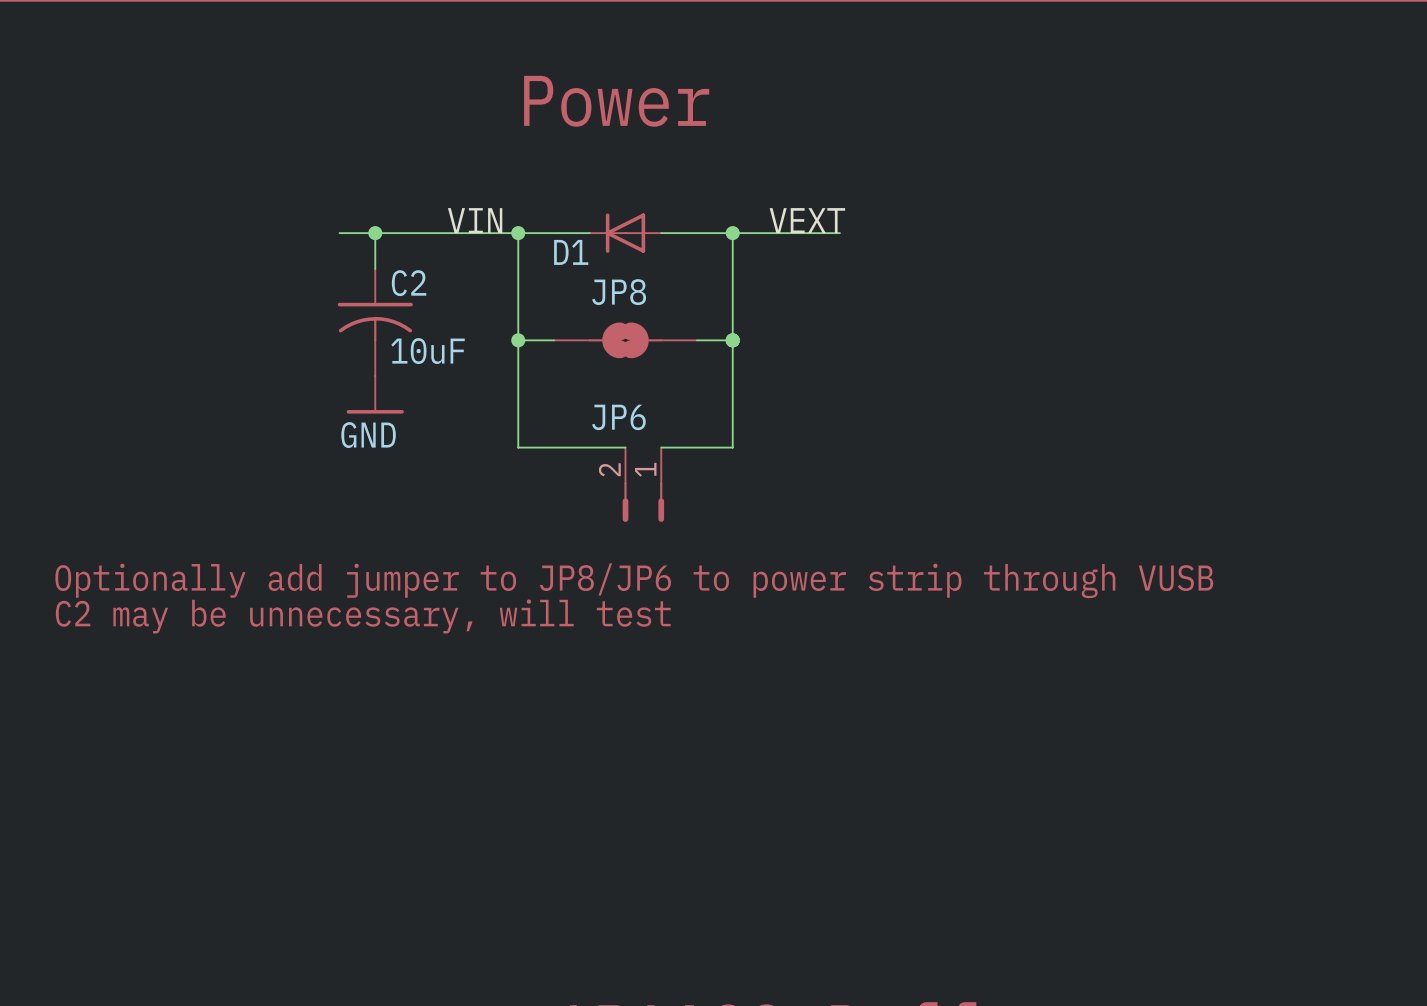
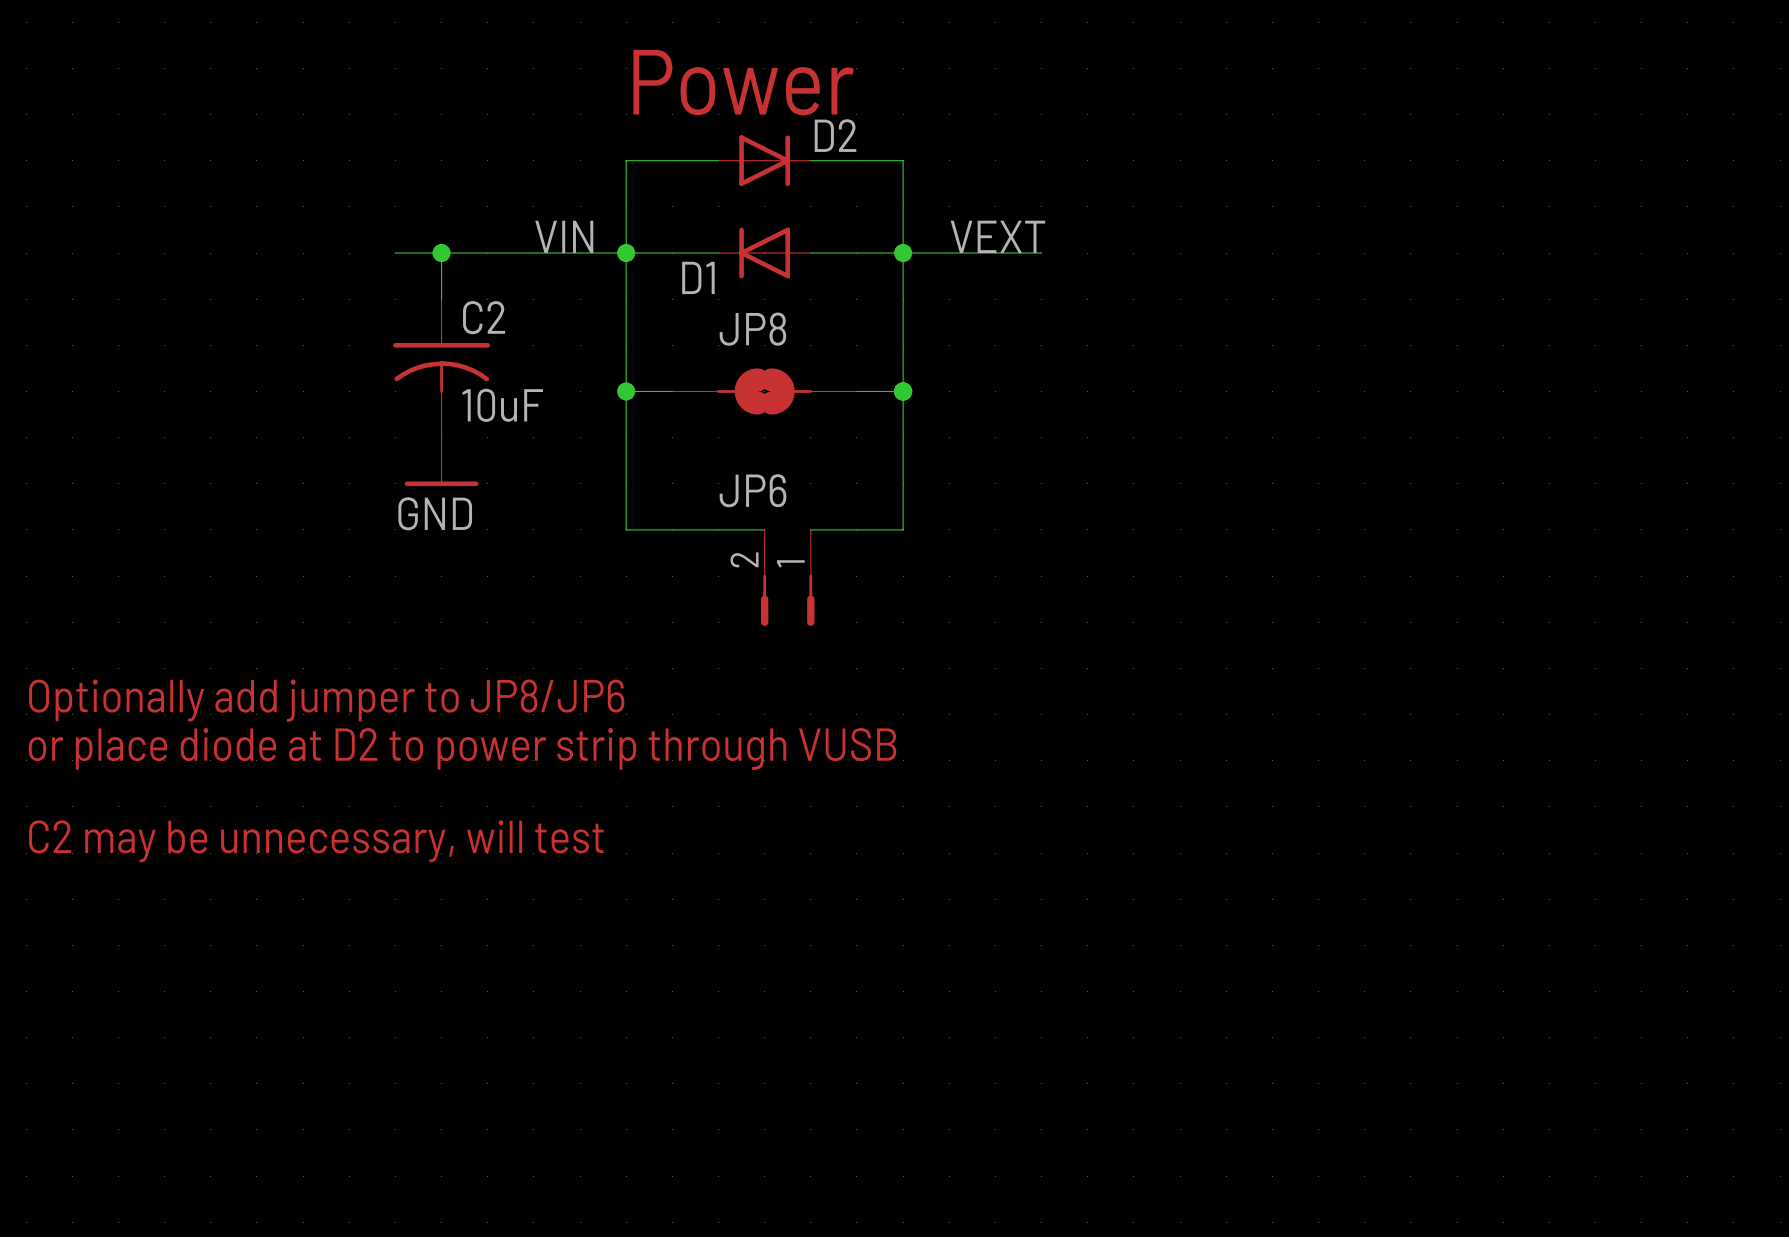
wire: none -> (718, 160) (626, 160) (626, 253)
D2: none -> (764, 160)
wire: none -> (810, 160) (903, 160) (903, 253)
text: Optionally add jumper to JP8/JP6 to power strip through VUSB (634, 580) -> Optionally add jumper to JP8/JP6 (326, 700)
text: C2 may be unnecessary, will test (363, 616) -> or place diode at D2 to power strip through VUSB (462, 748)
text: none -> C2 may be unnecessary, will test (316, 841)

